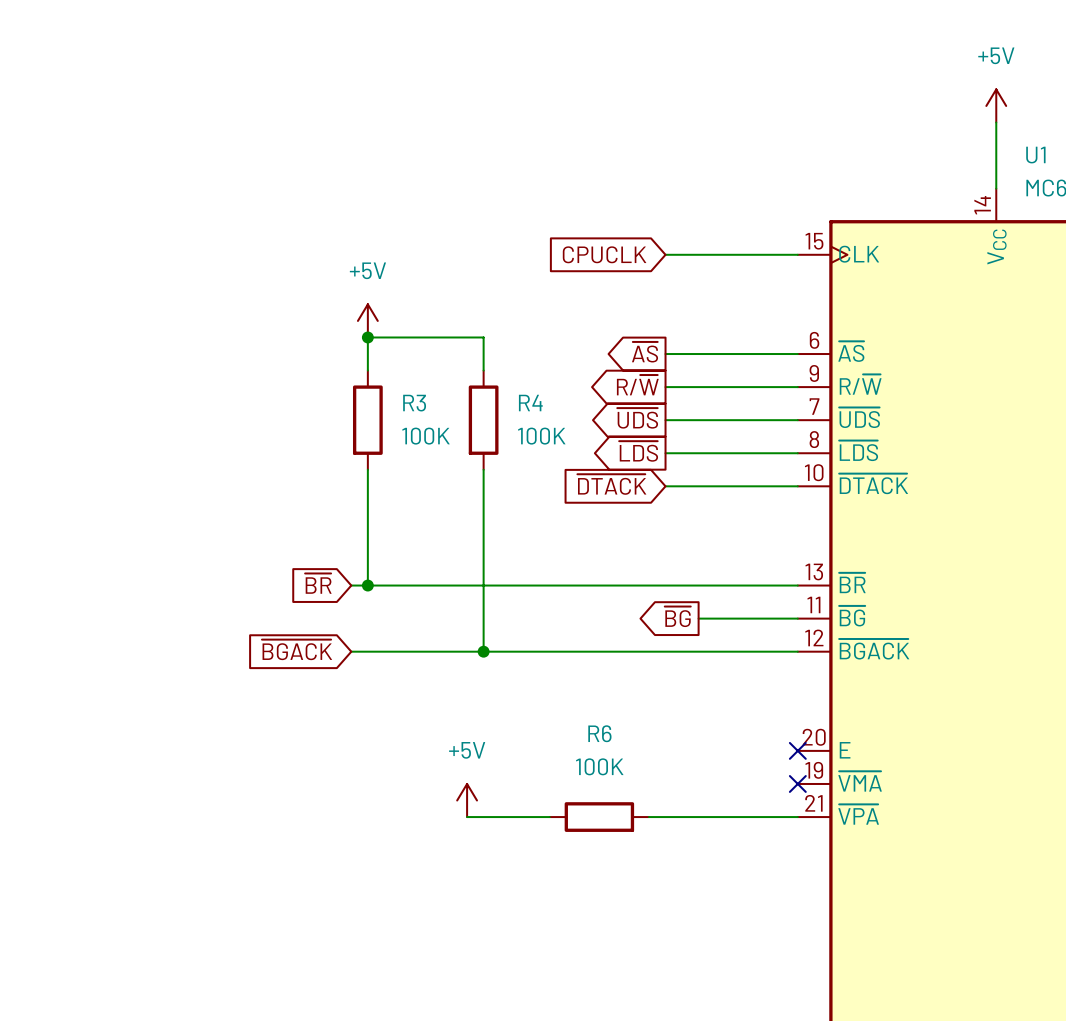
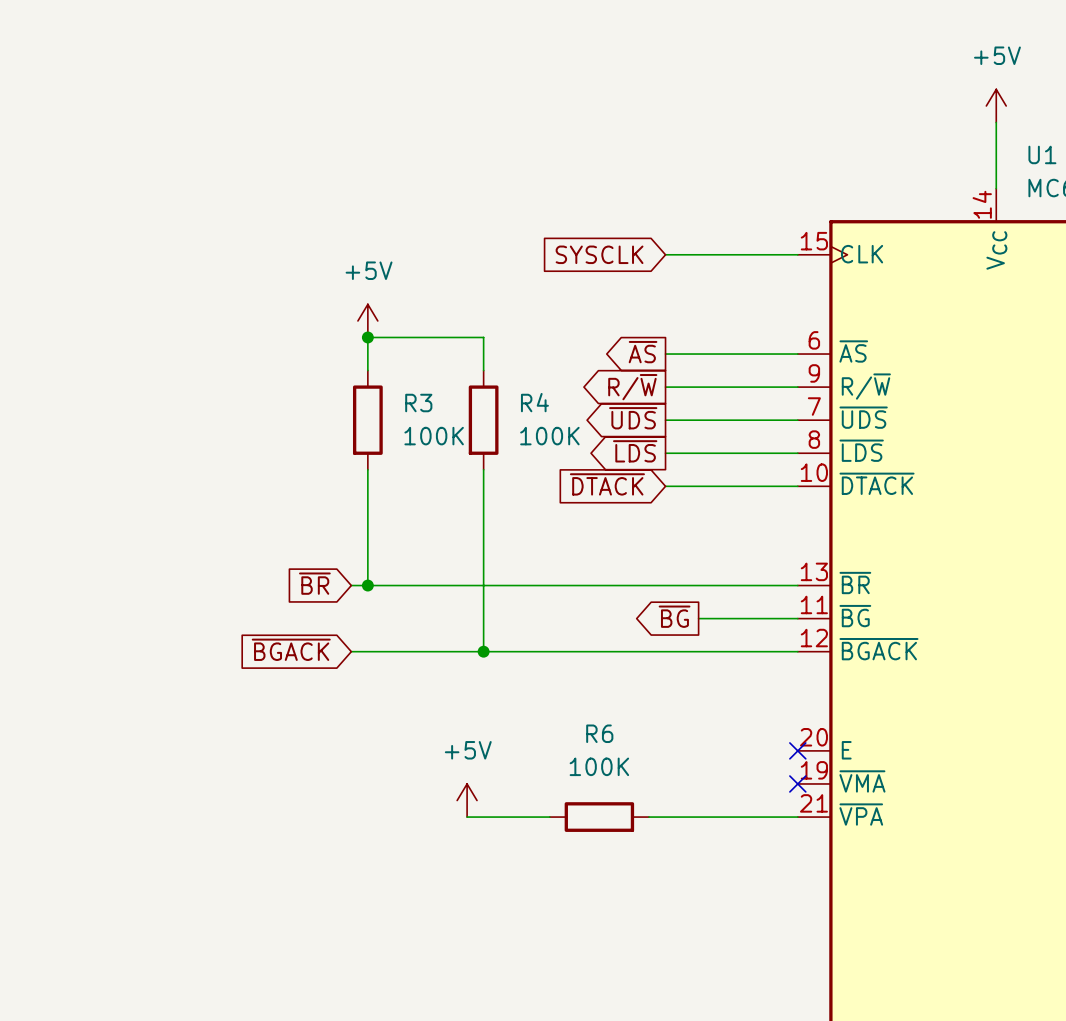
global label: CPUCLK (604, 254) -> SYSCLK (599, 254)

